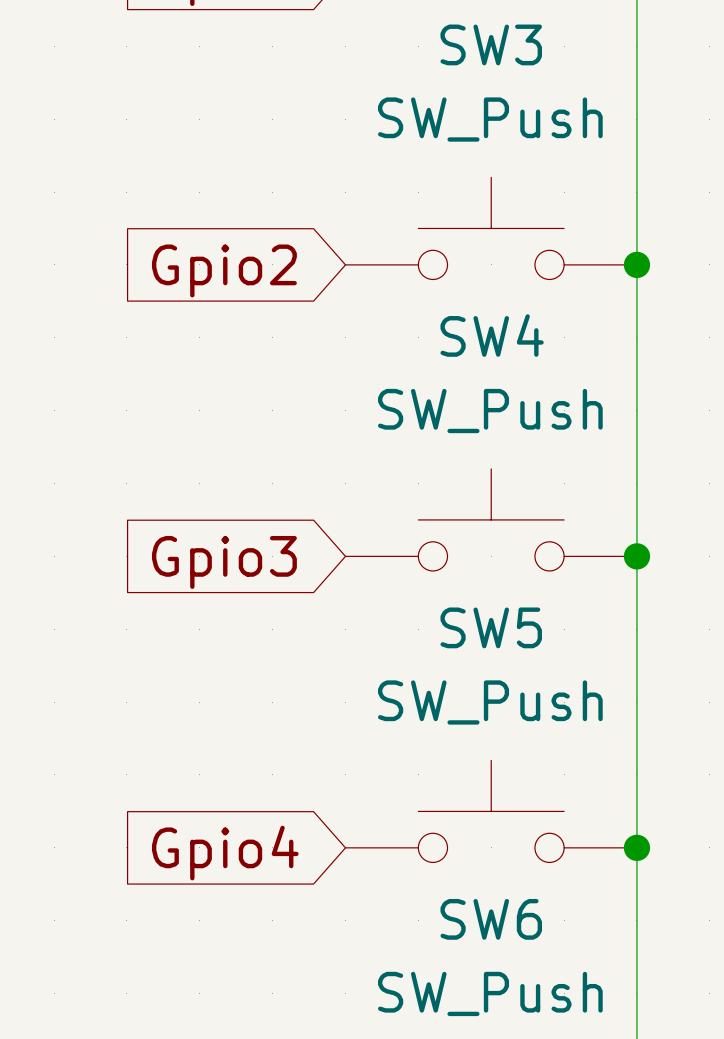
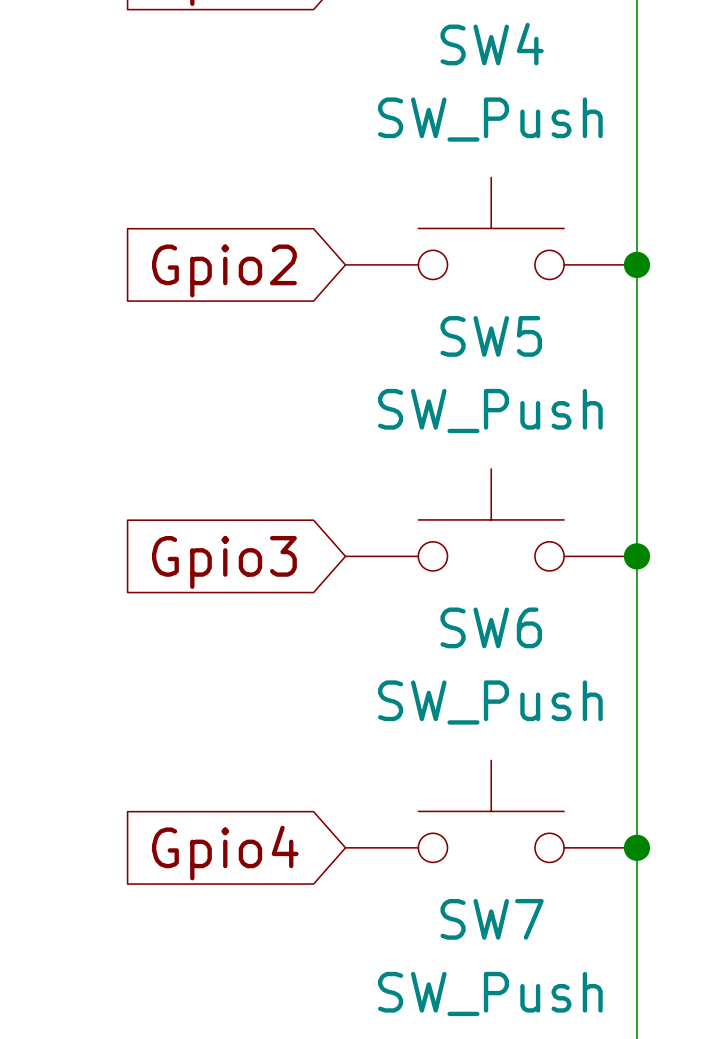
SW3 name: SW3 (491, 44) -> SW4 (492, 44)
SW4 name: SW4 (492, 335) -> SW5 (491, 336)
SW5 name: SW5 (491, 627) -> SW6 (491, 627)
SW6 name: SW6 (491, 919) -> SW7 (492, 919)

